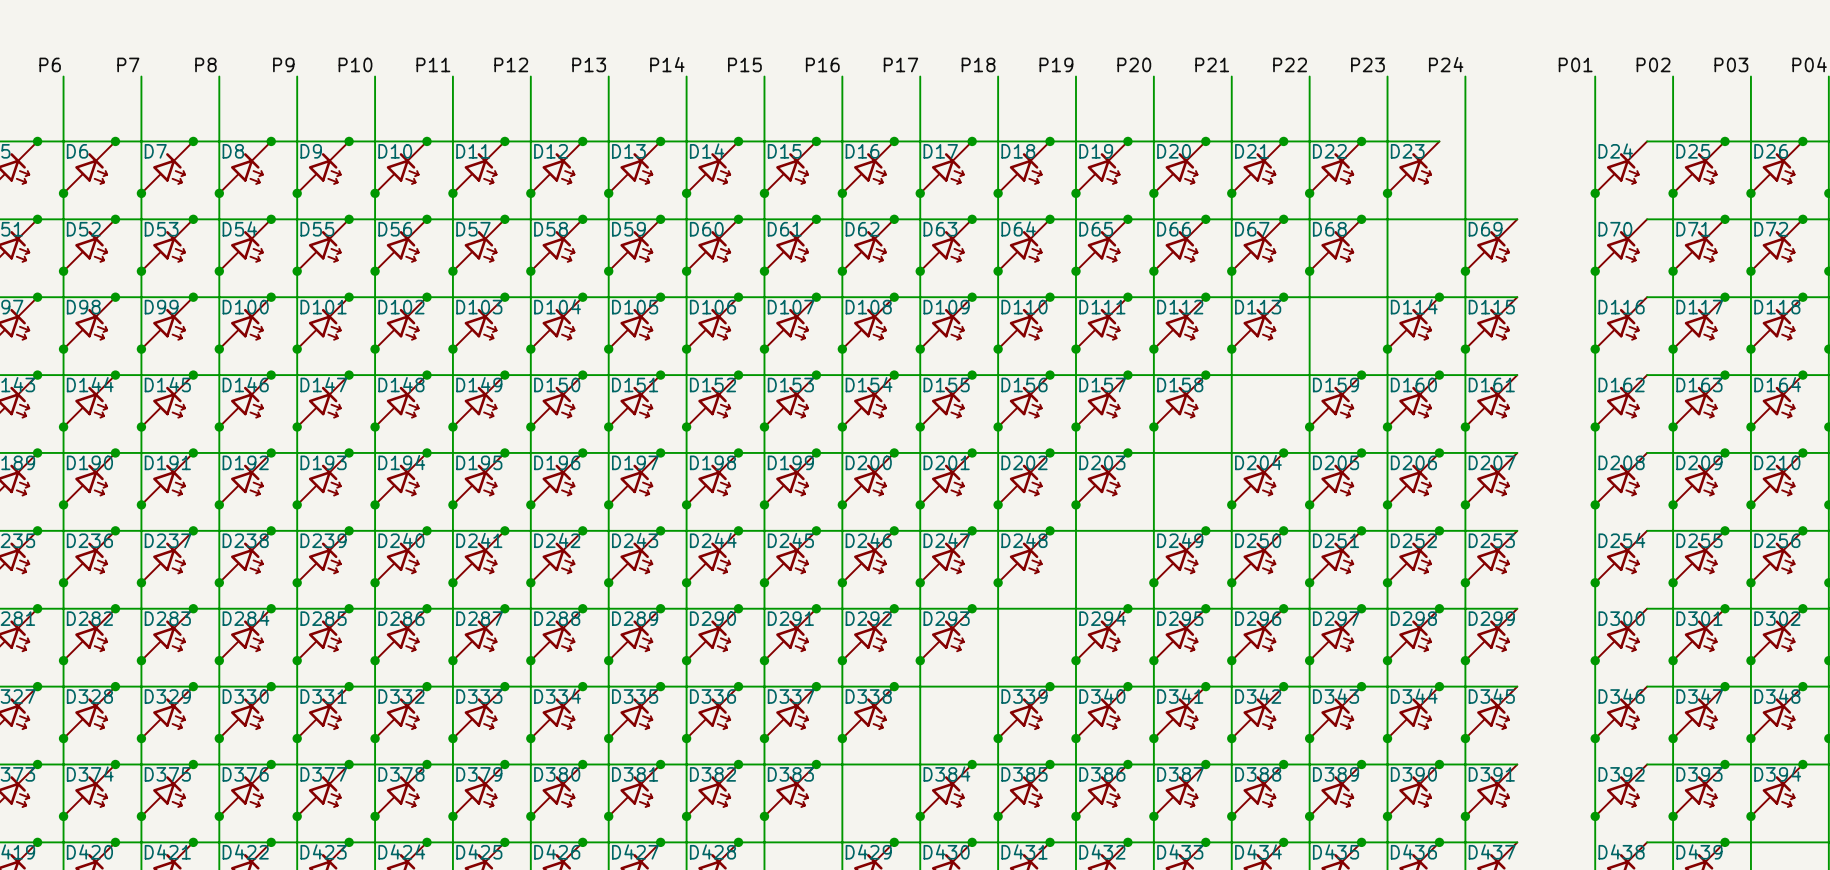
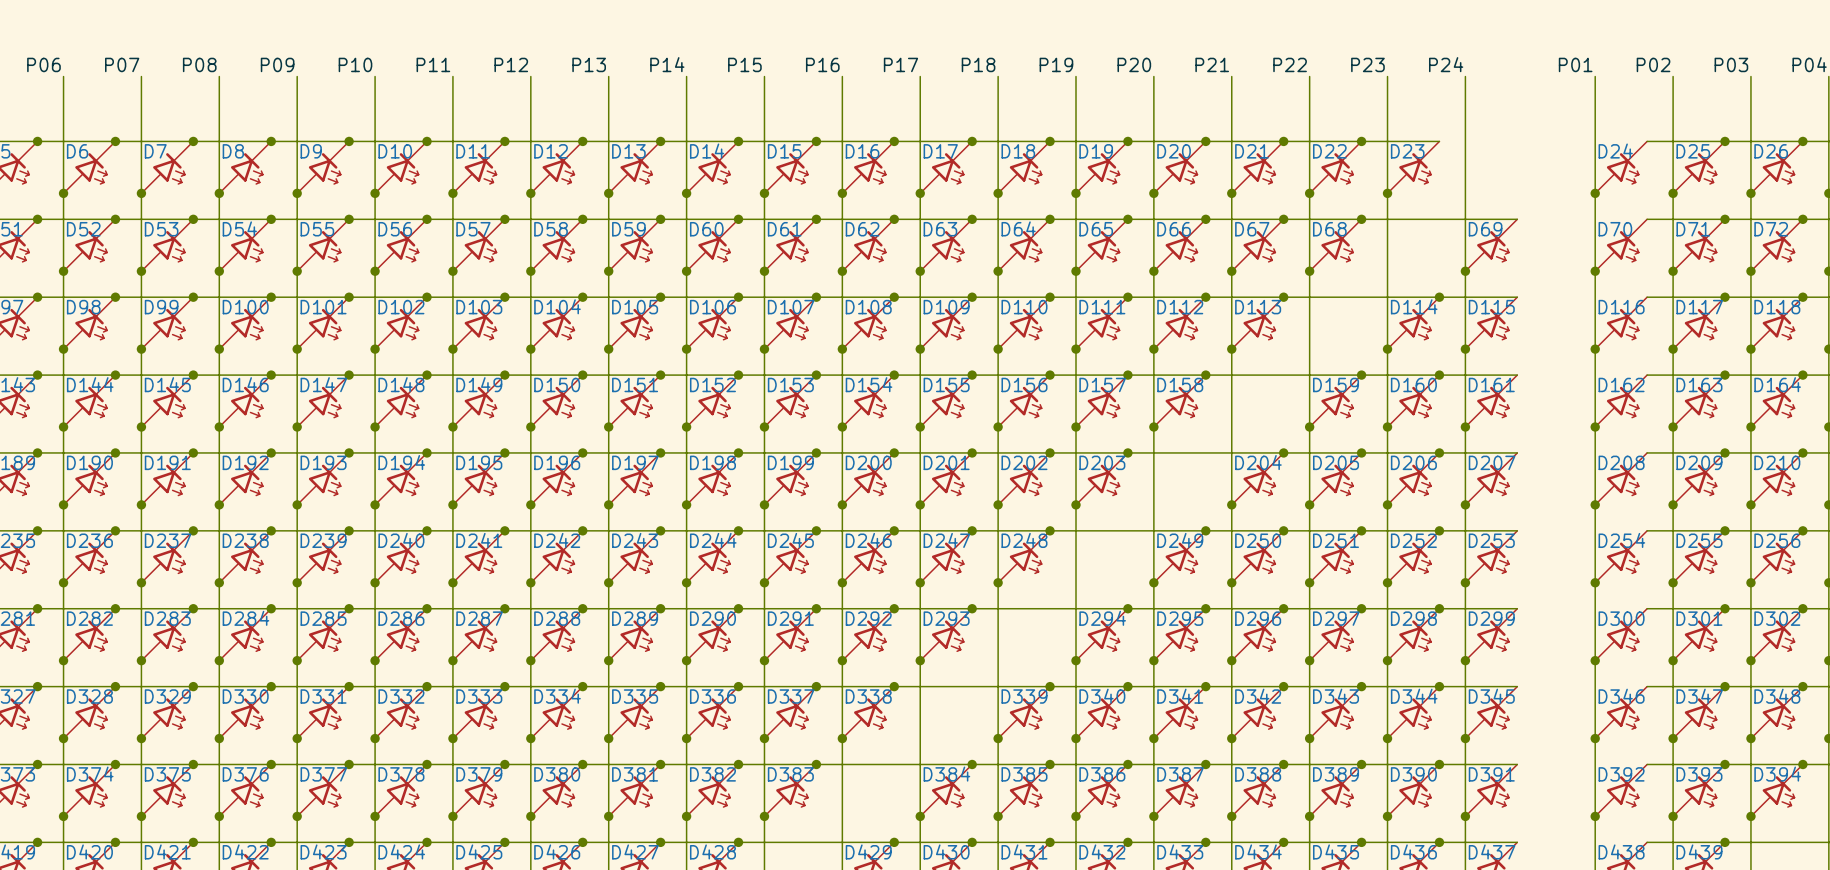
label: P6 (50, 64) -> P06 (43, 64)
label: P7 (128, 64) -> P07 (122, 64)
label: P8 (205, 64) -> P08 (199, 64)
label: P9 (283, 64) -> P09 (277, 64)

